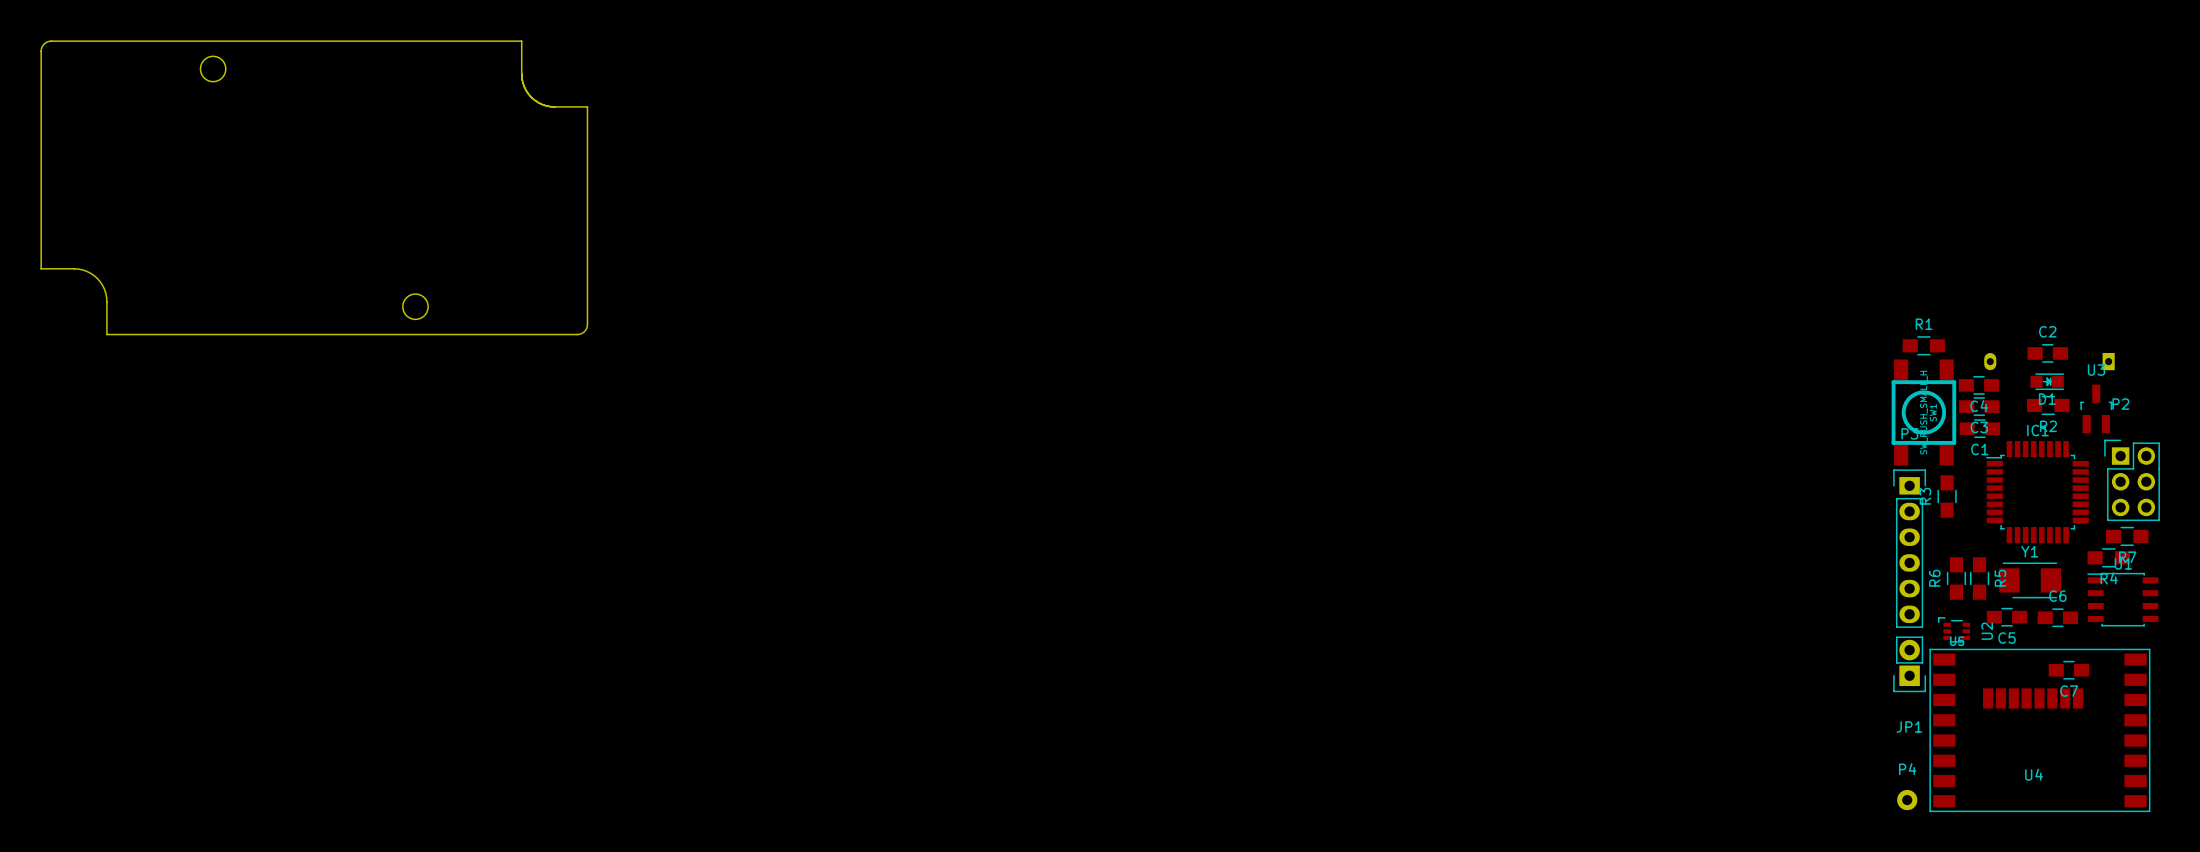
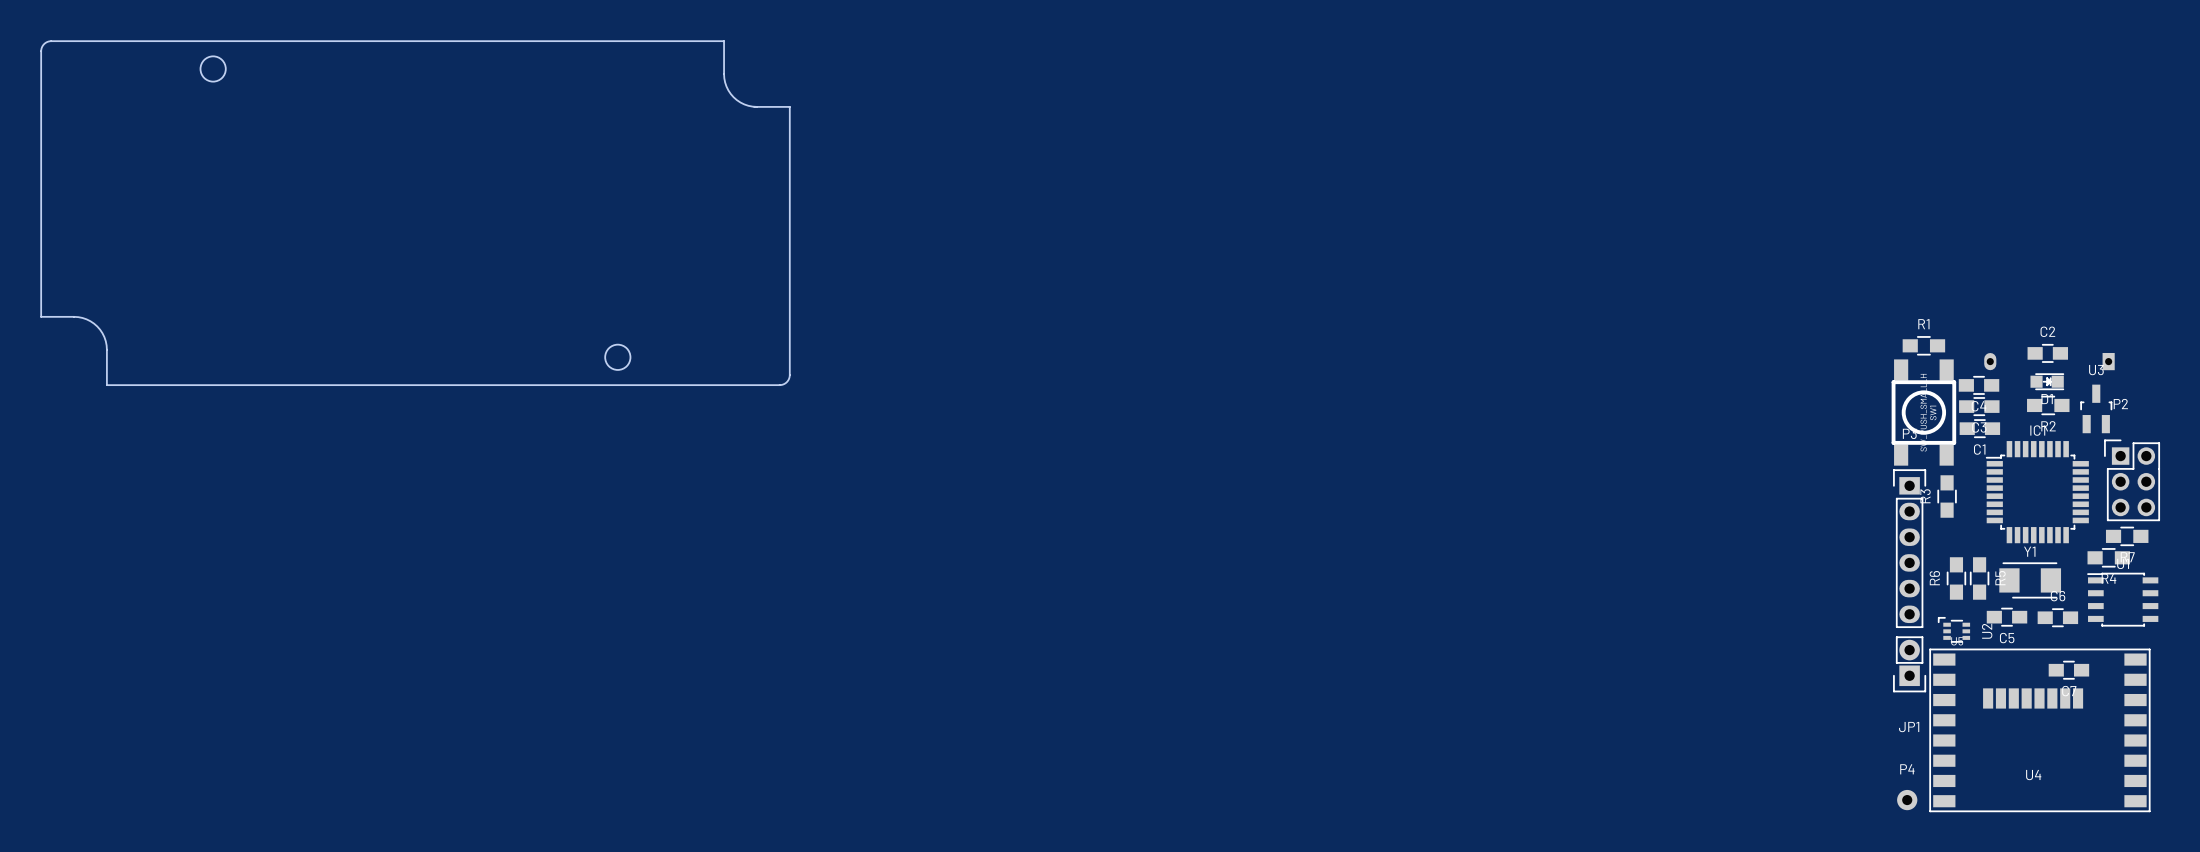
board edge: (521, 41) (521, 74) -> (521, 41) (724, 41) (724, 78) (728, 90) (740, 102) (756, 106)
board edge: (521, 74) (524, 86) (531, 97) (542, 104) (554, 106) -> none
board edge: (521, 74) (524, 86) (531, 97) (542, 104) (554, 106) -> none
board edge: (554, 106) (587, 106) (587, 324) (585, 330) (579, 334) (106, 334) (106, 297) (102, 285) (97, 278) (86, 271) (78, 269) (41, 268) -> (754, 106) (789, 106) (789, 375) (787, 381) (782, 384) (106, 385) (106, 345) (102, 333) (97, 326) (86, 319) (78, 317) (41, 316) (41, 268)
round board edge position: (415, 306) -> (617, 357)

